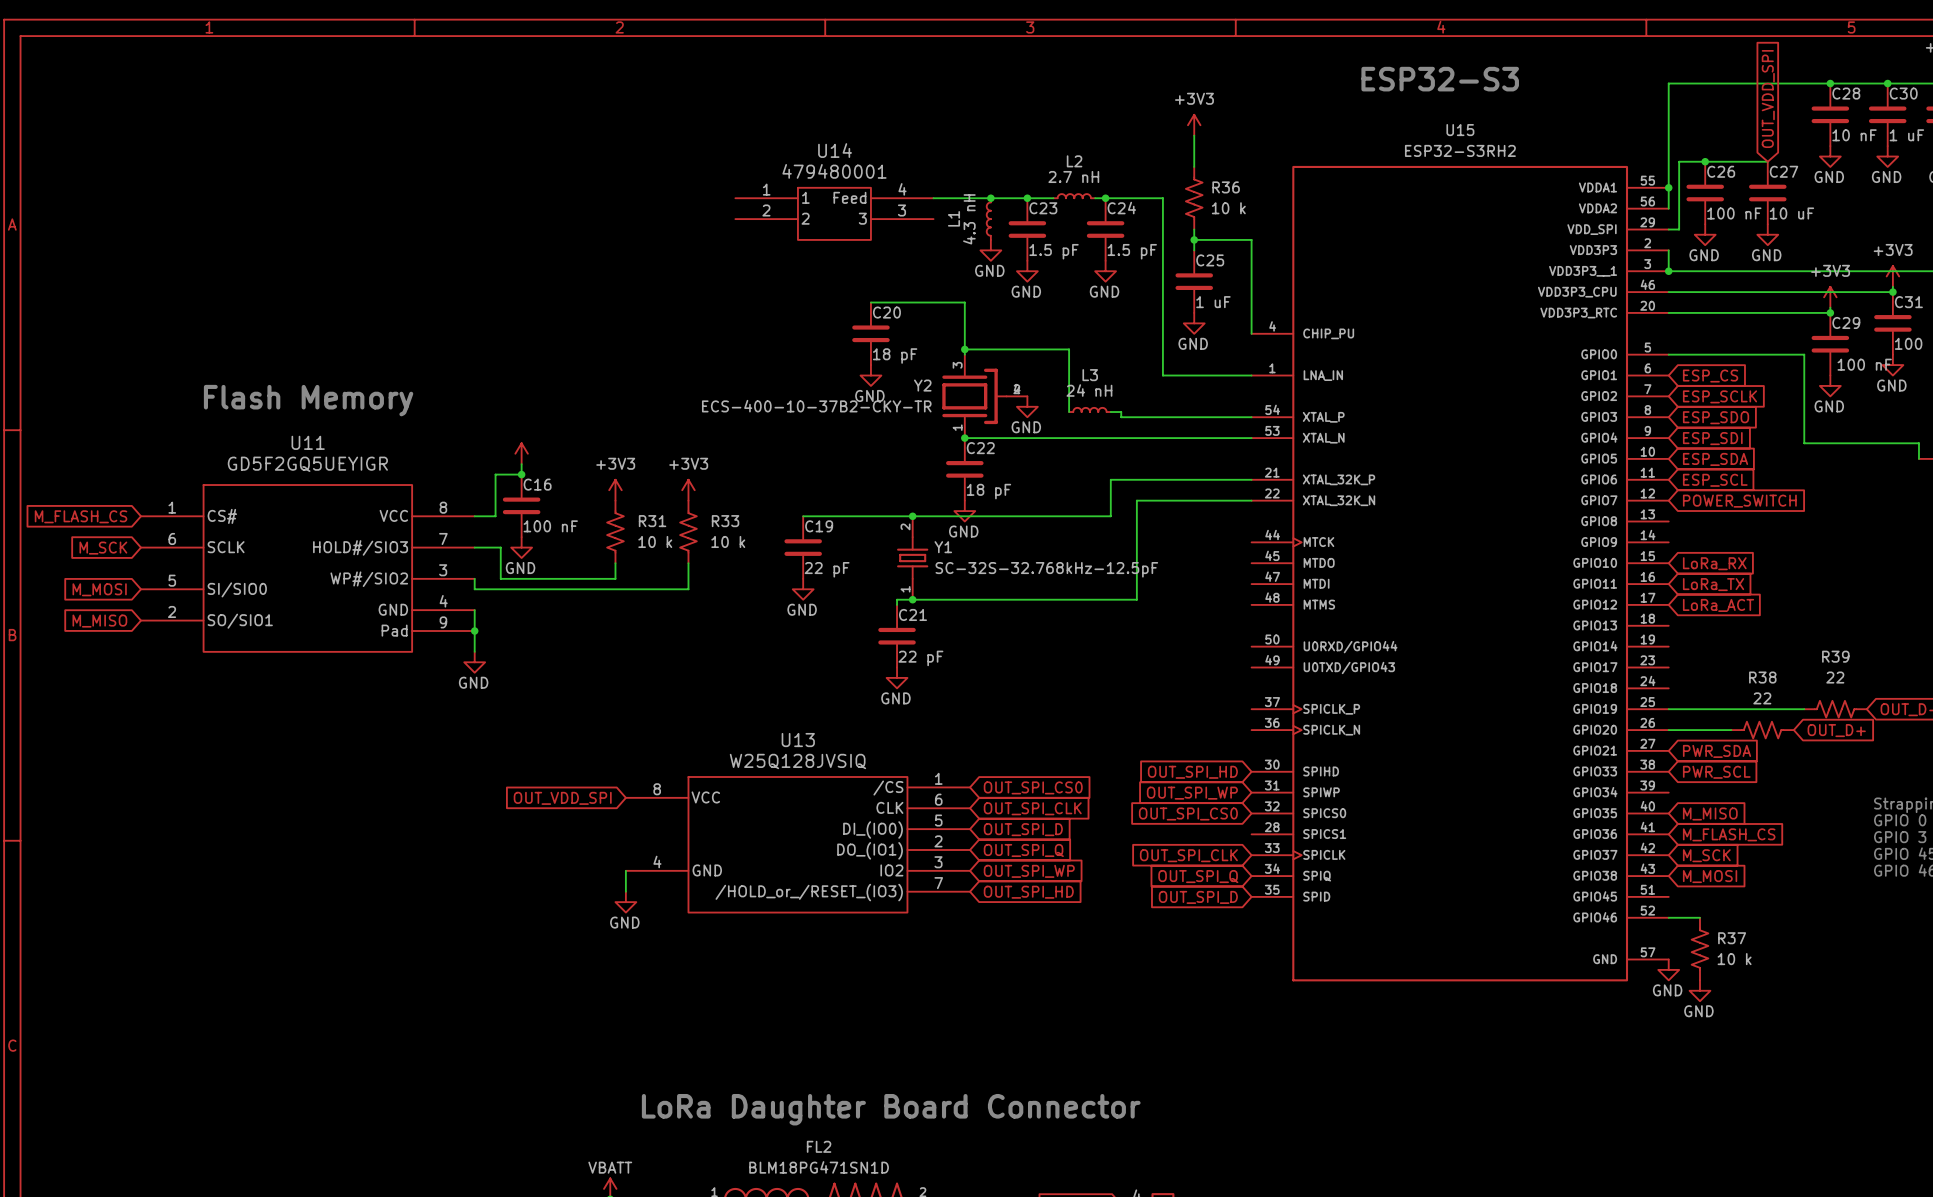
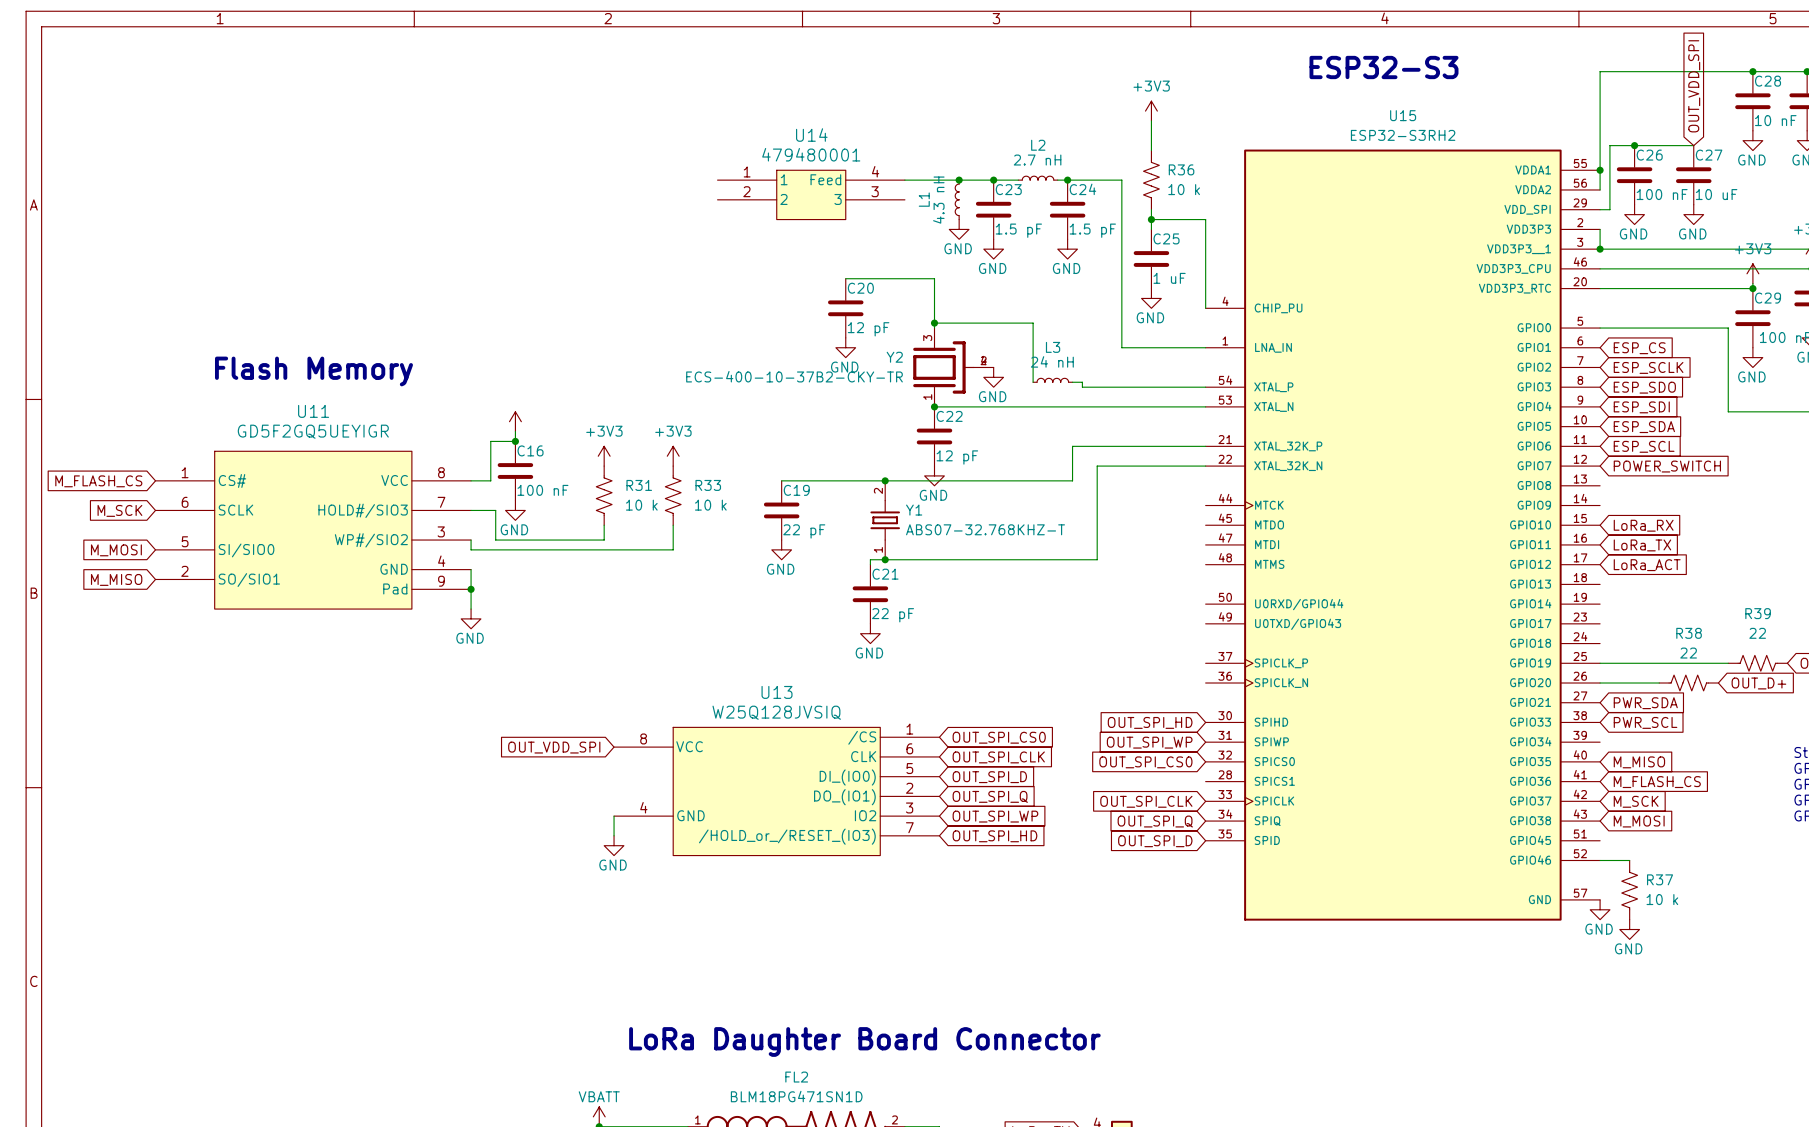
C20 value: 18 pF (895, 356) -> 12 pF (868, 329)
C22 value: 18 pF (988, 491) -> 12 pF (957, 457)
Y1 value: SC-32S-32.768kHz-12.5pF (1046, 569) -> ABS07-32.768KHZ-T (985, 529)

